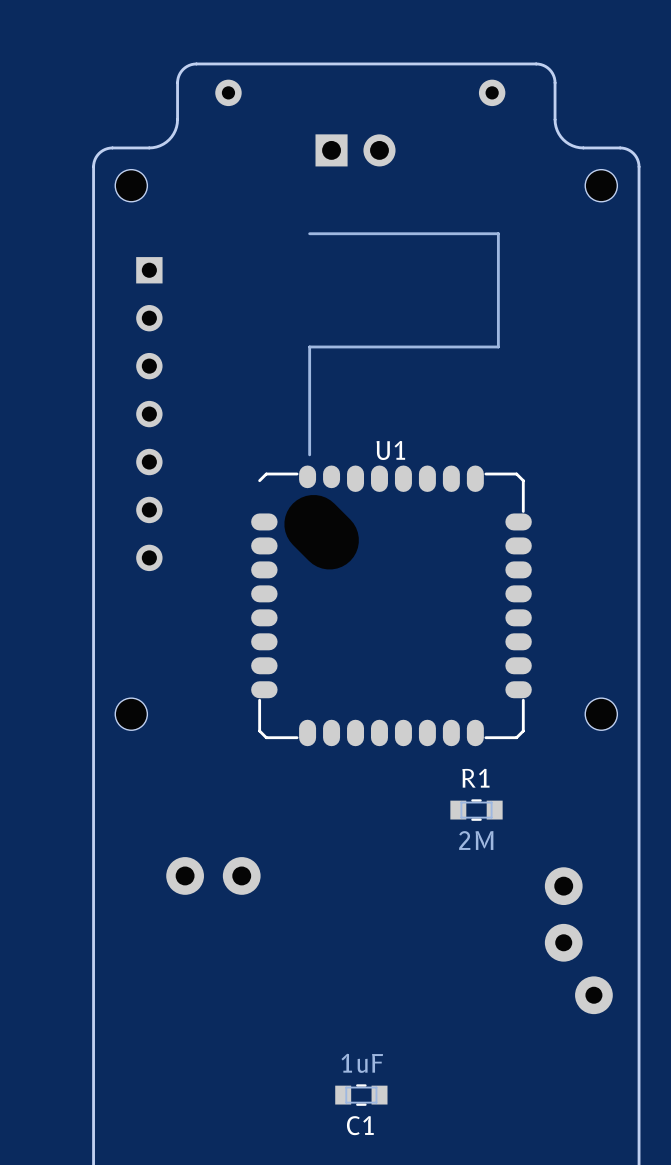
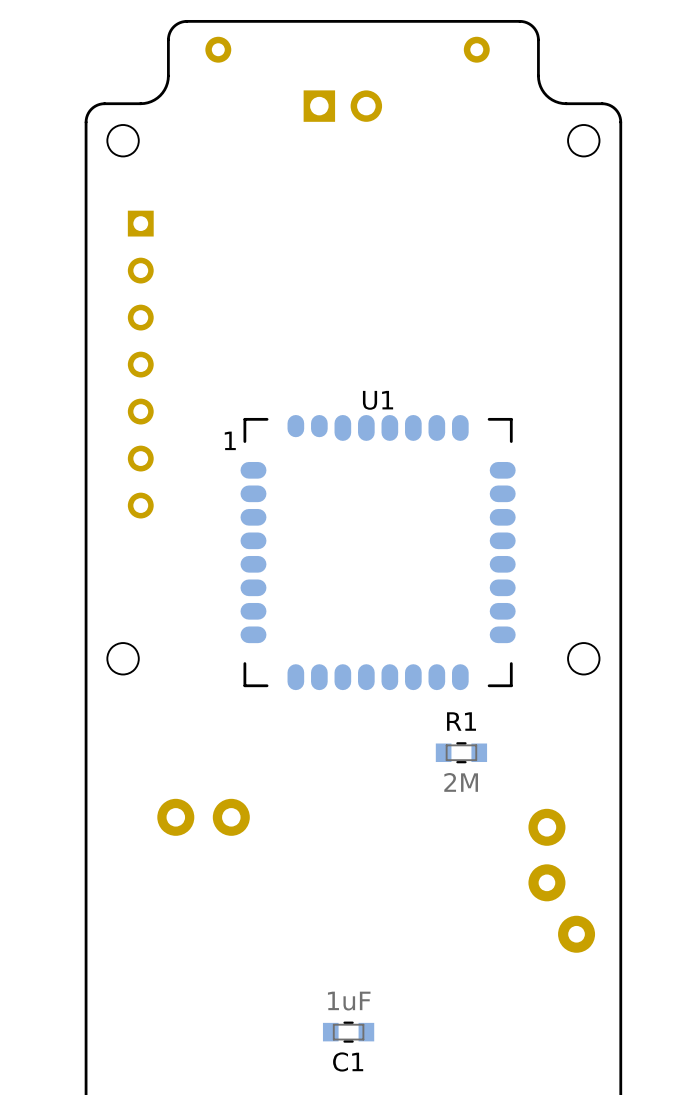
U1 footprint: [251, 232, 532, 747] -> [240, 415, 516, 691]

